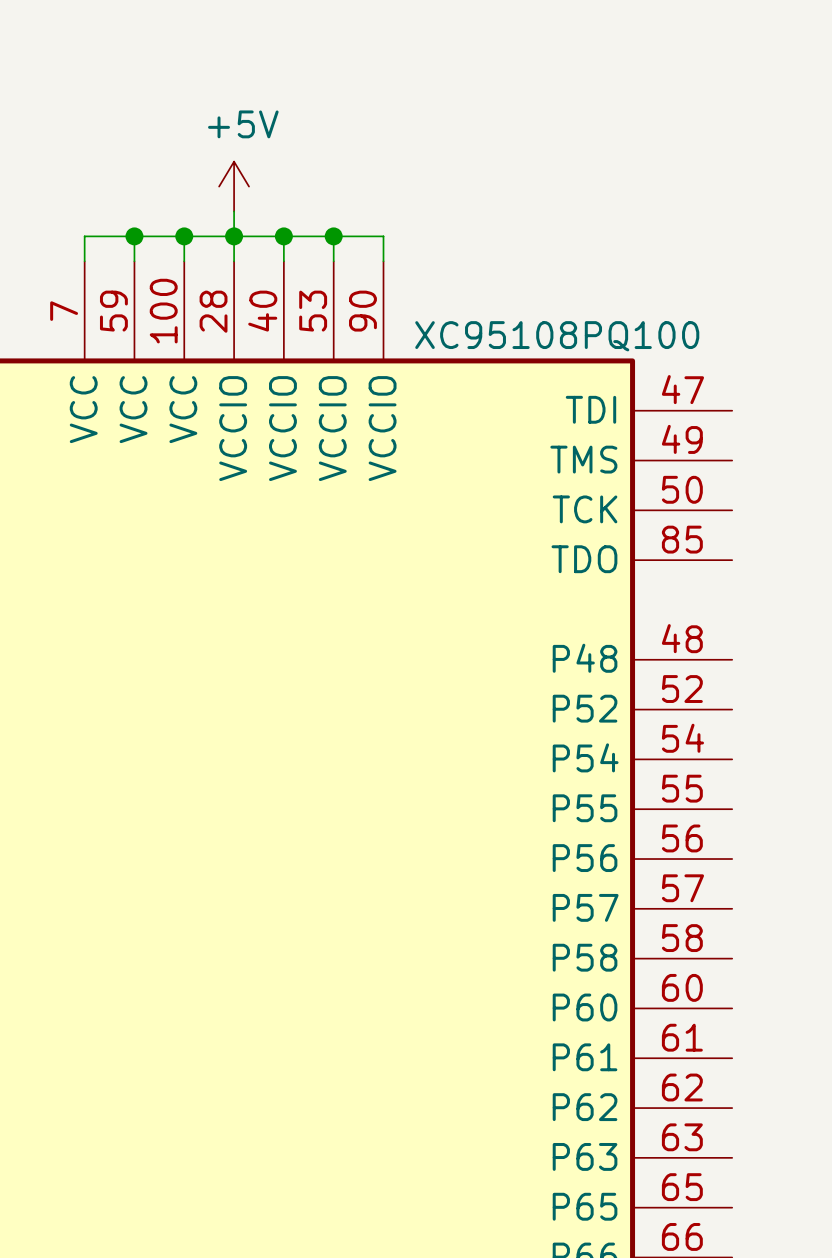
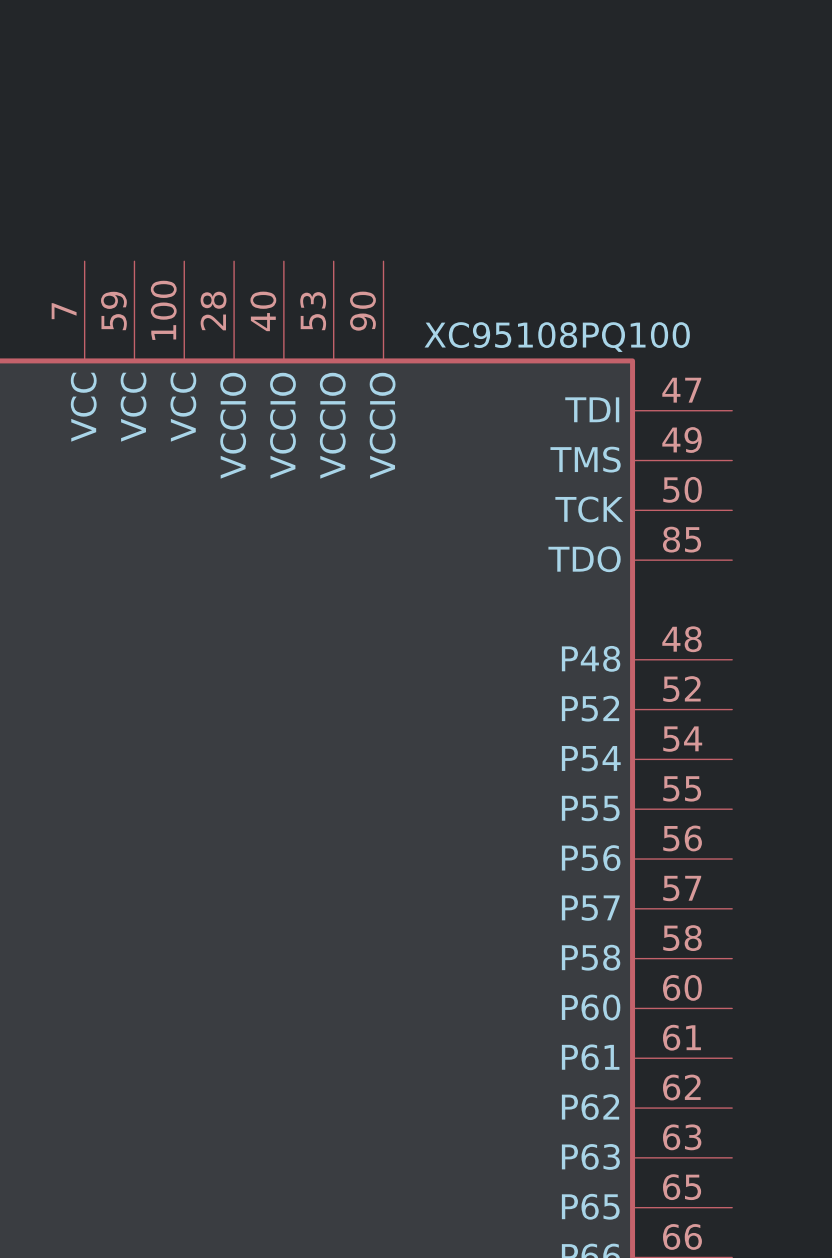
power symbol: +5V (234, 186) -> none
wire: (234, 211) (234, 261) -> none
wire: (134, 236) (134, 261) -> none
junction: (134, 236) -> none
wire: (184, 236) (184, 261) -> none
junction: (184, 236) -> none
junction: (234, 236) -> none
wire: (283, 236) (283, 261) -> none
junction: (283, 236) -> none
wire: (333, 236) (333, 261) -> none
junction: (333, 236) -> none
wire: (84, 261) (84, 236) (383, 236) (383, 261) -> none

